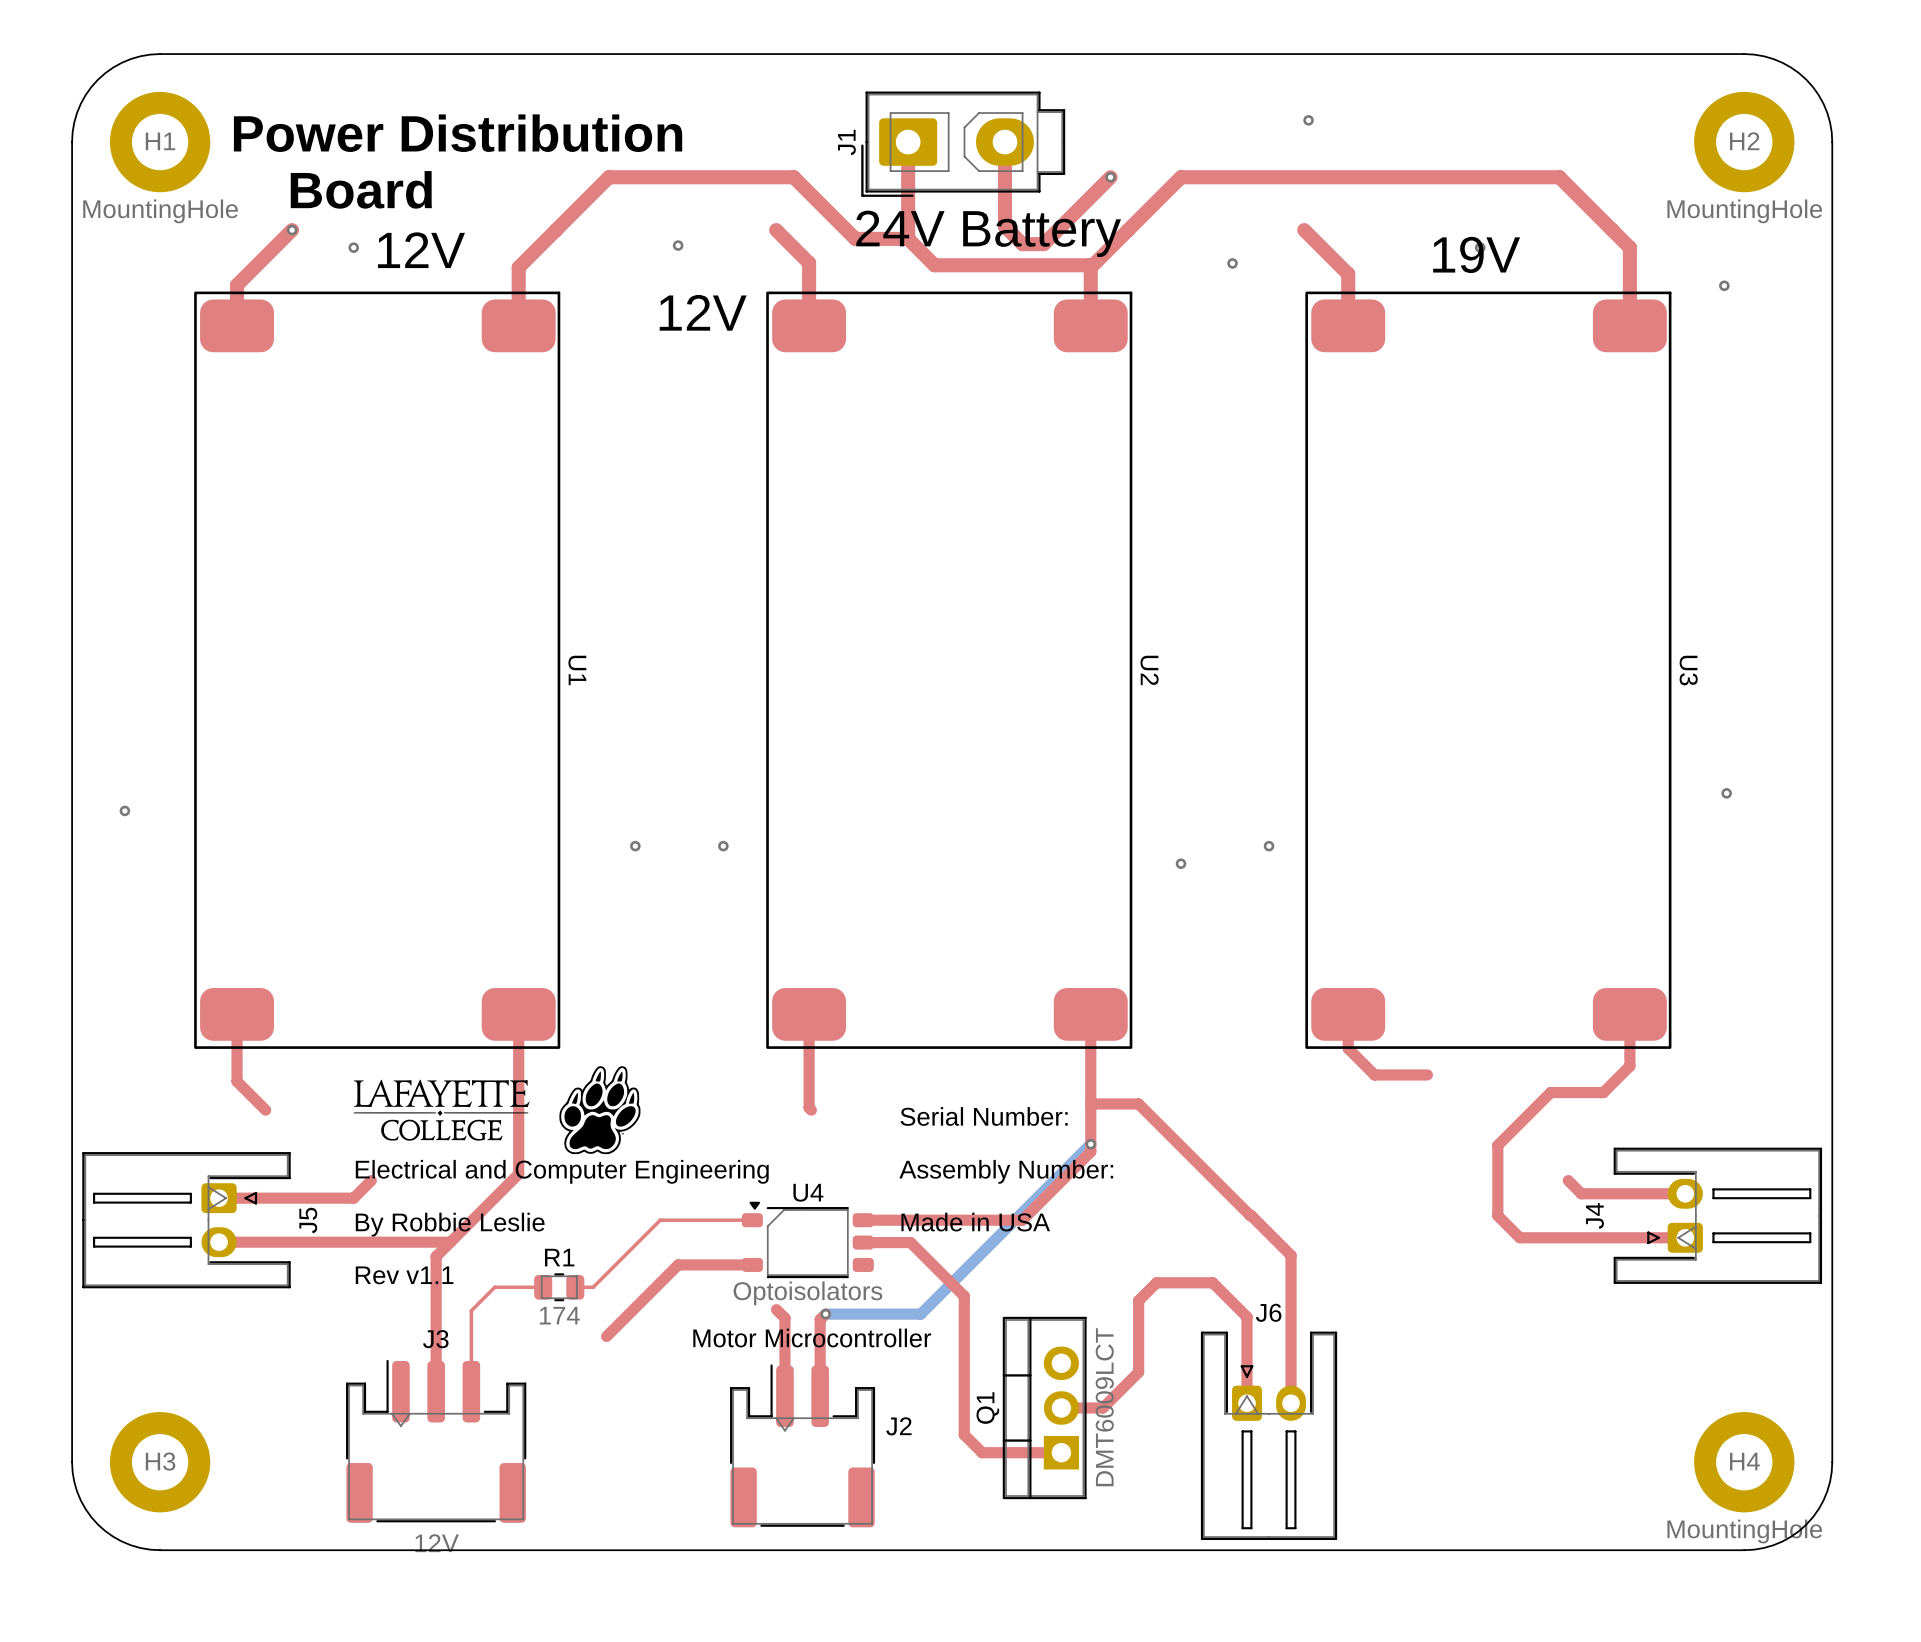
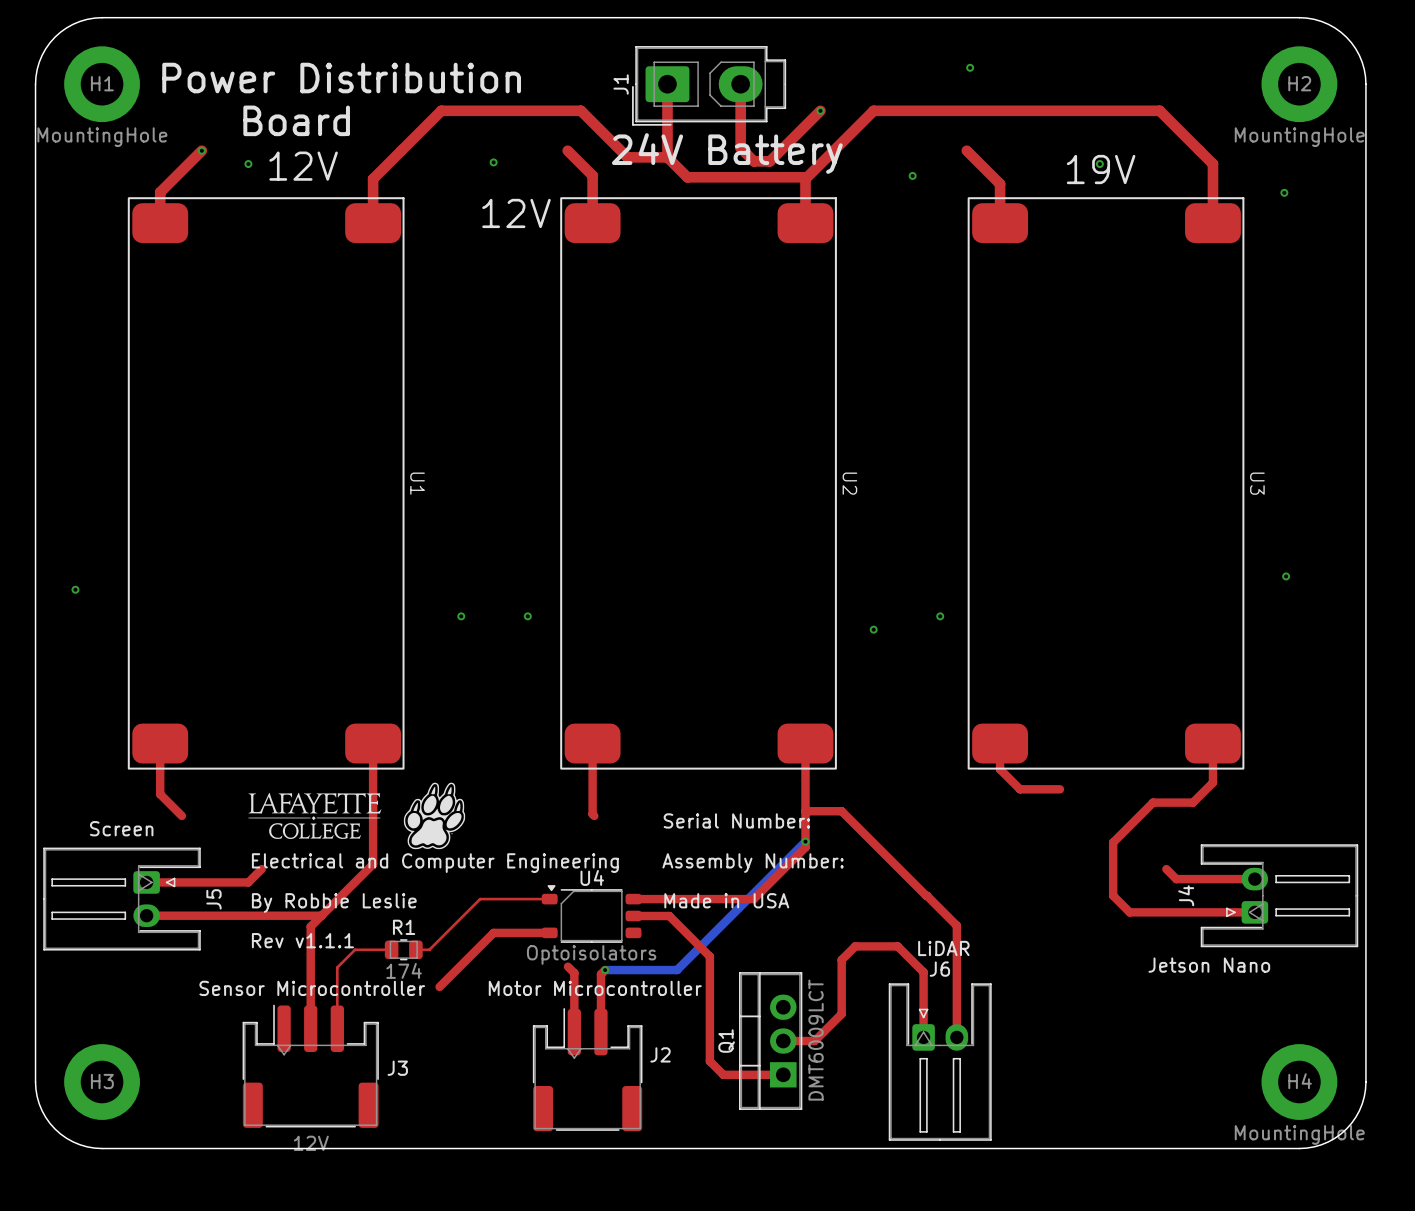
text: none -> Screen (121, 828)
text: Rev v1.1 (404, 1275) -> Rev v1.1.1 (302, 940)
text: none -> LiDAR (943, 948)
text: none -> Jetson Nano (1209, 965)
text: none -> Sensor Microcontroller (312, 988)
J3 name position: J3 (435, 1339) -> J3 (397, 1068)

